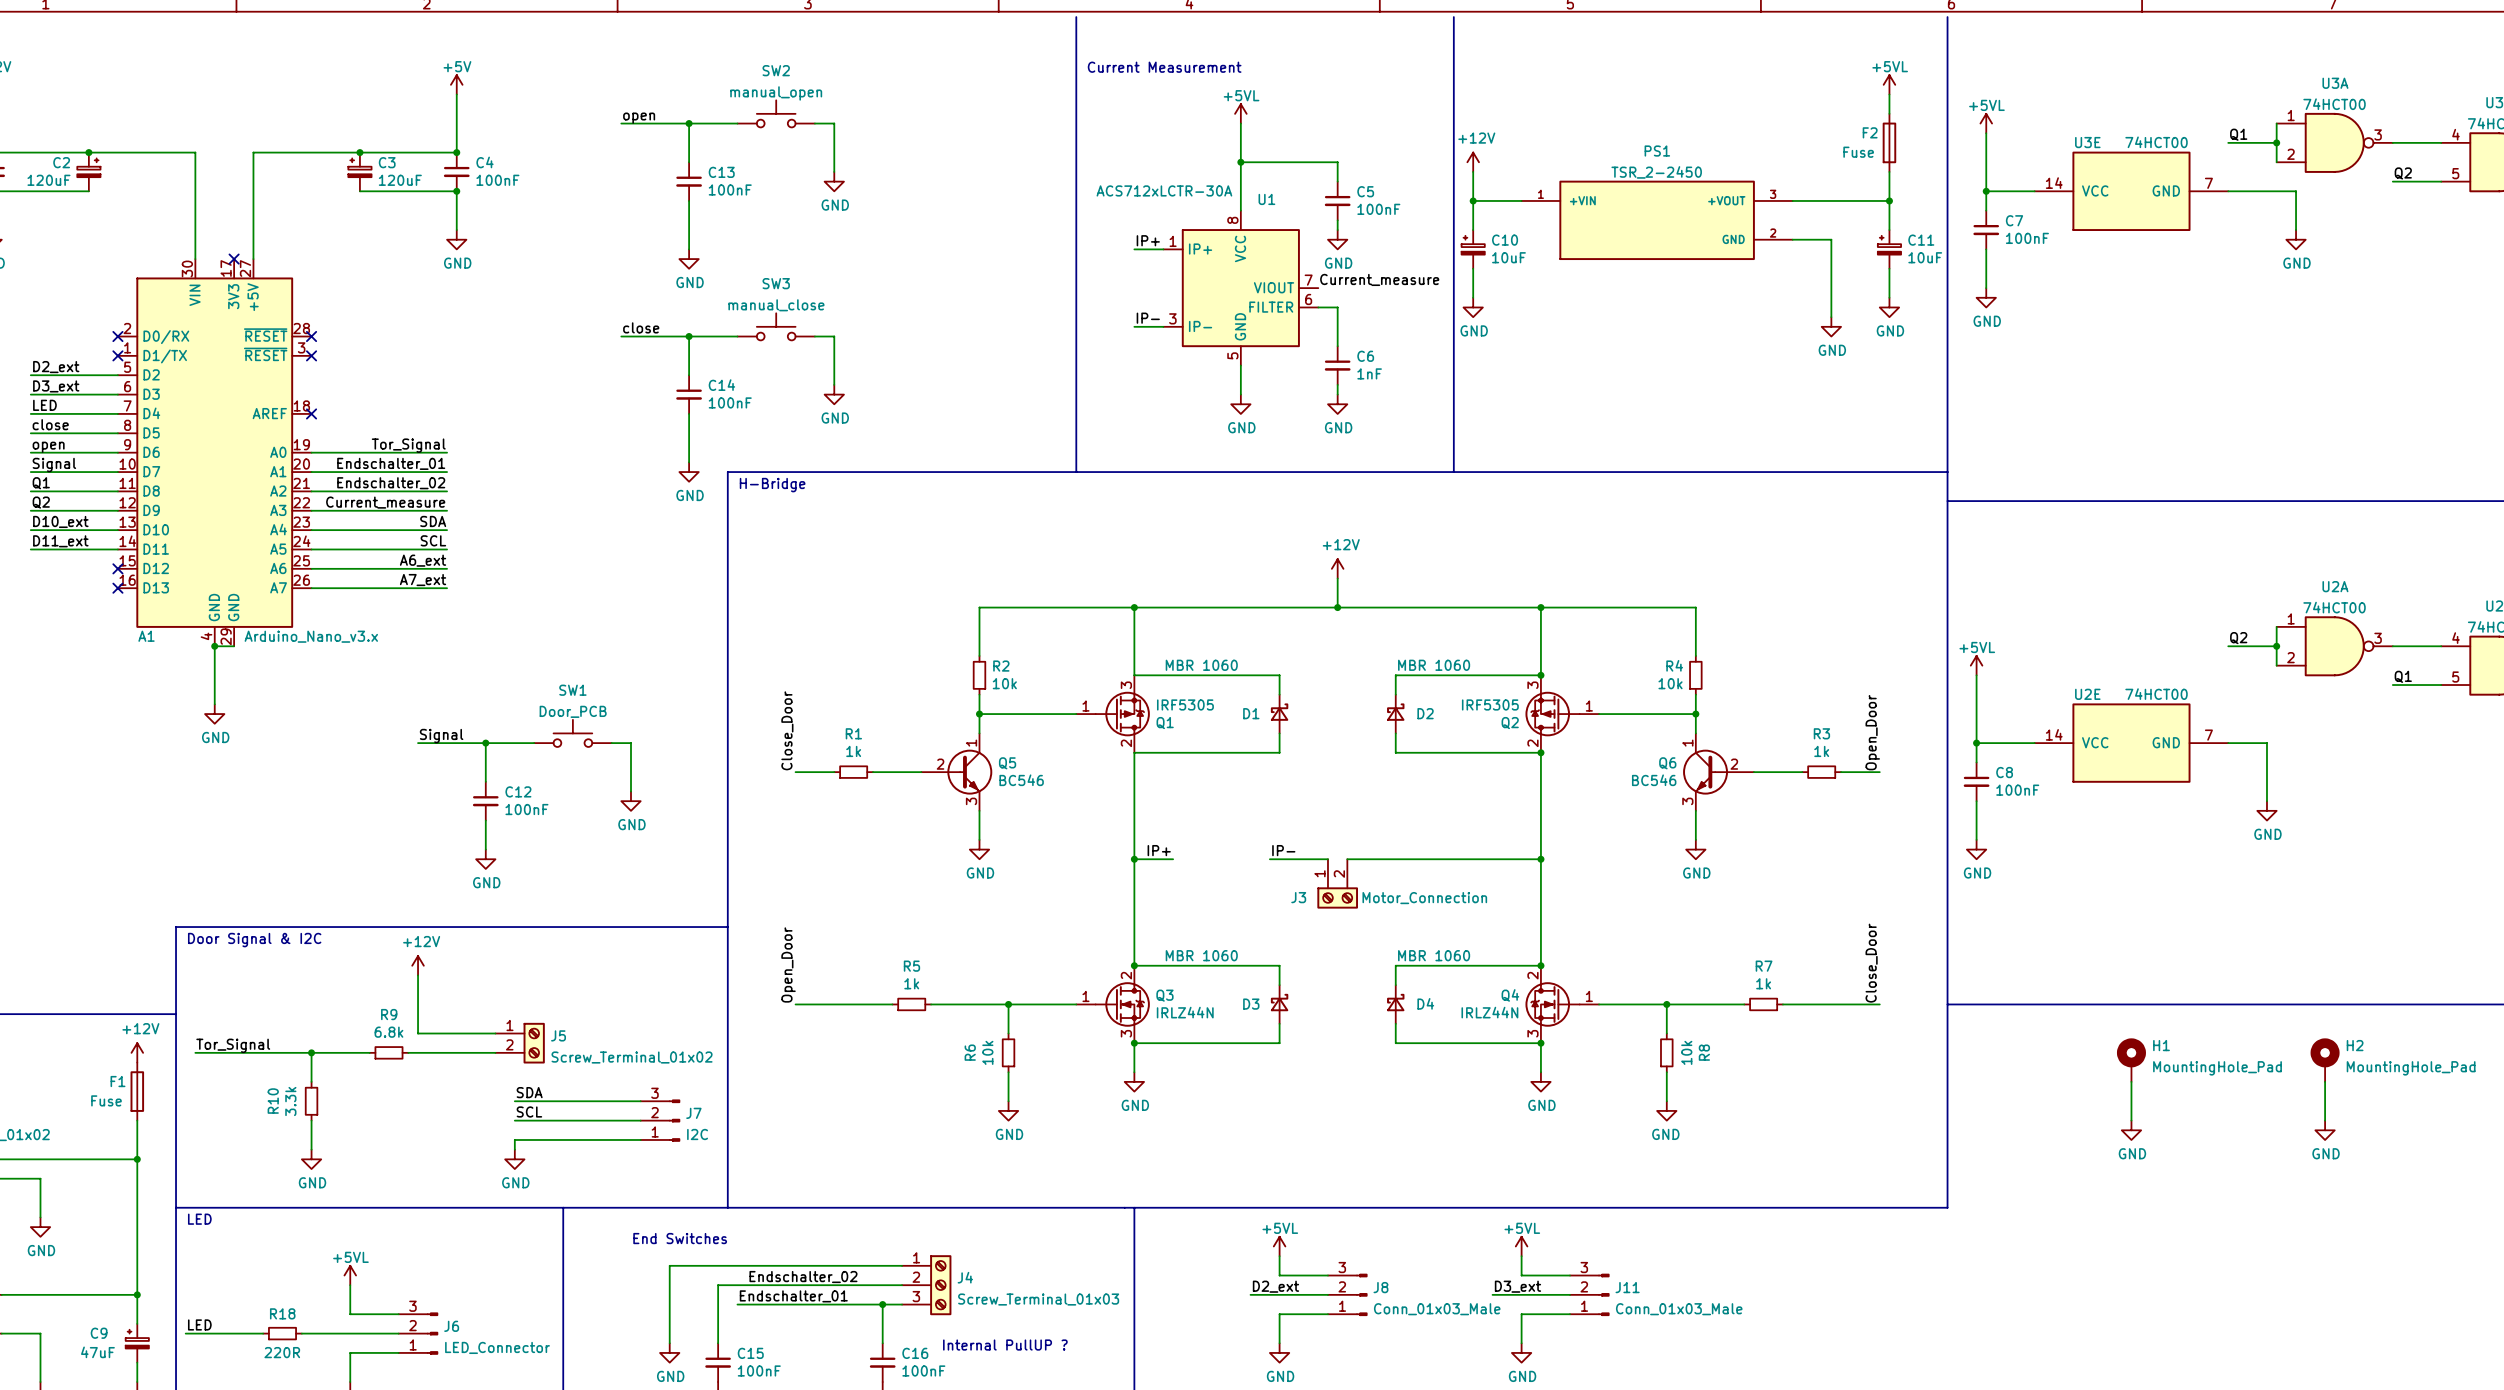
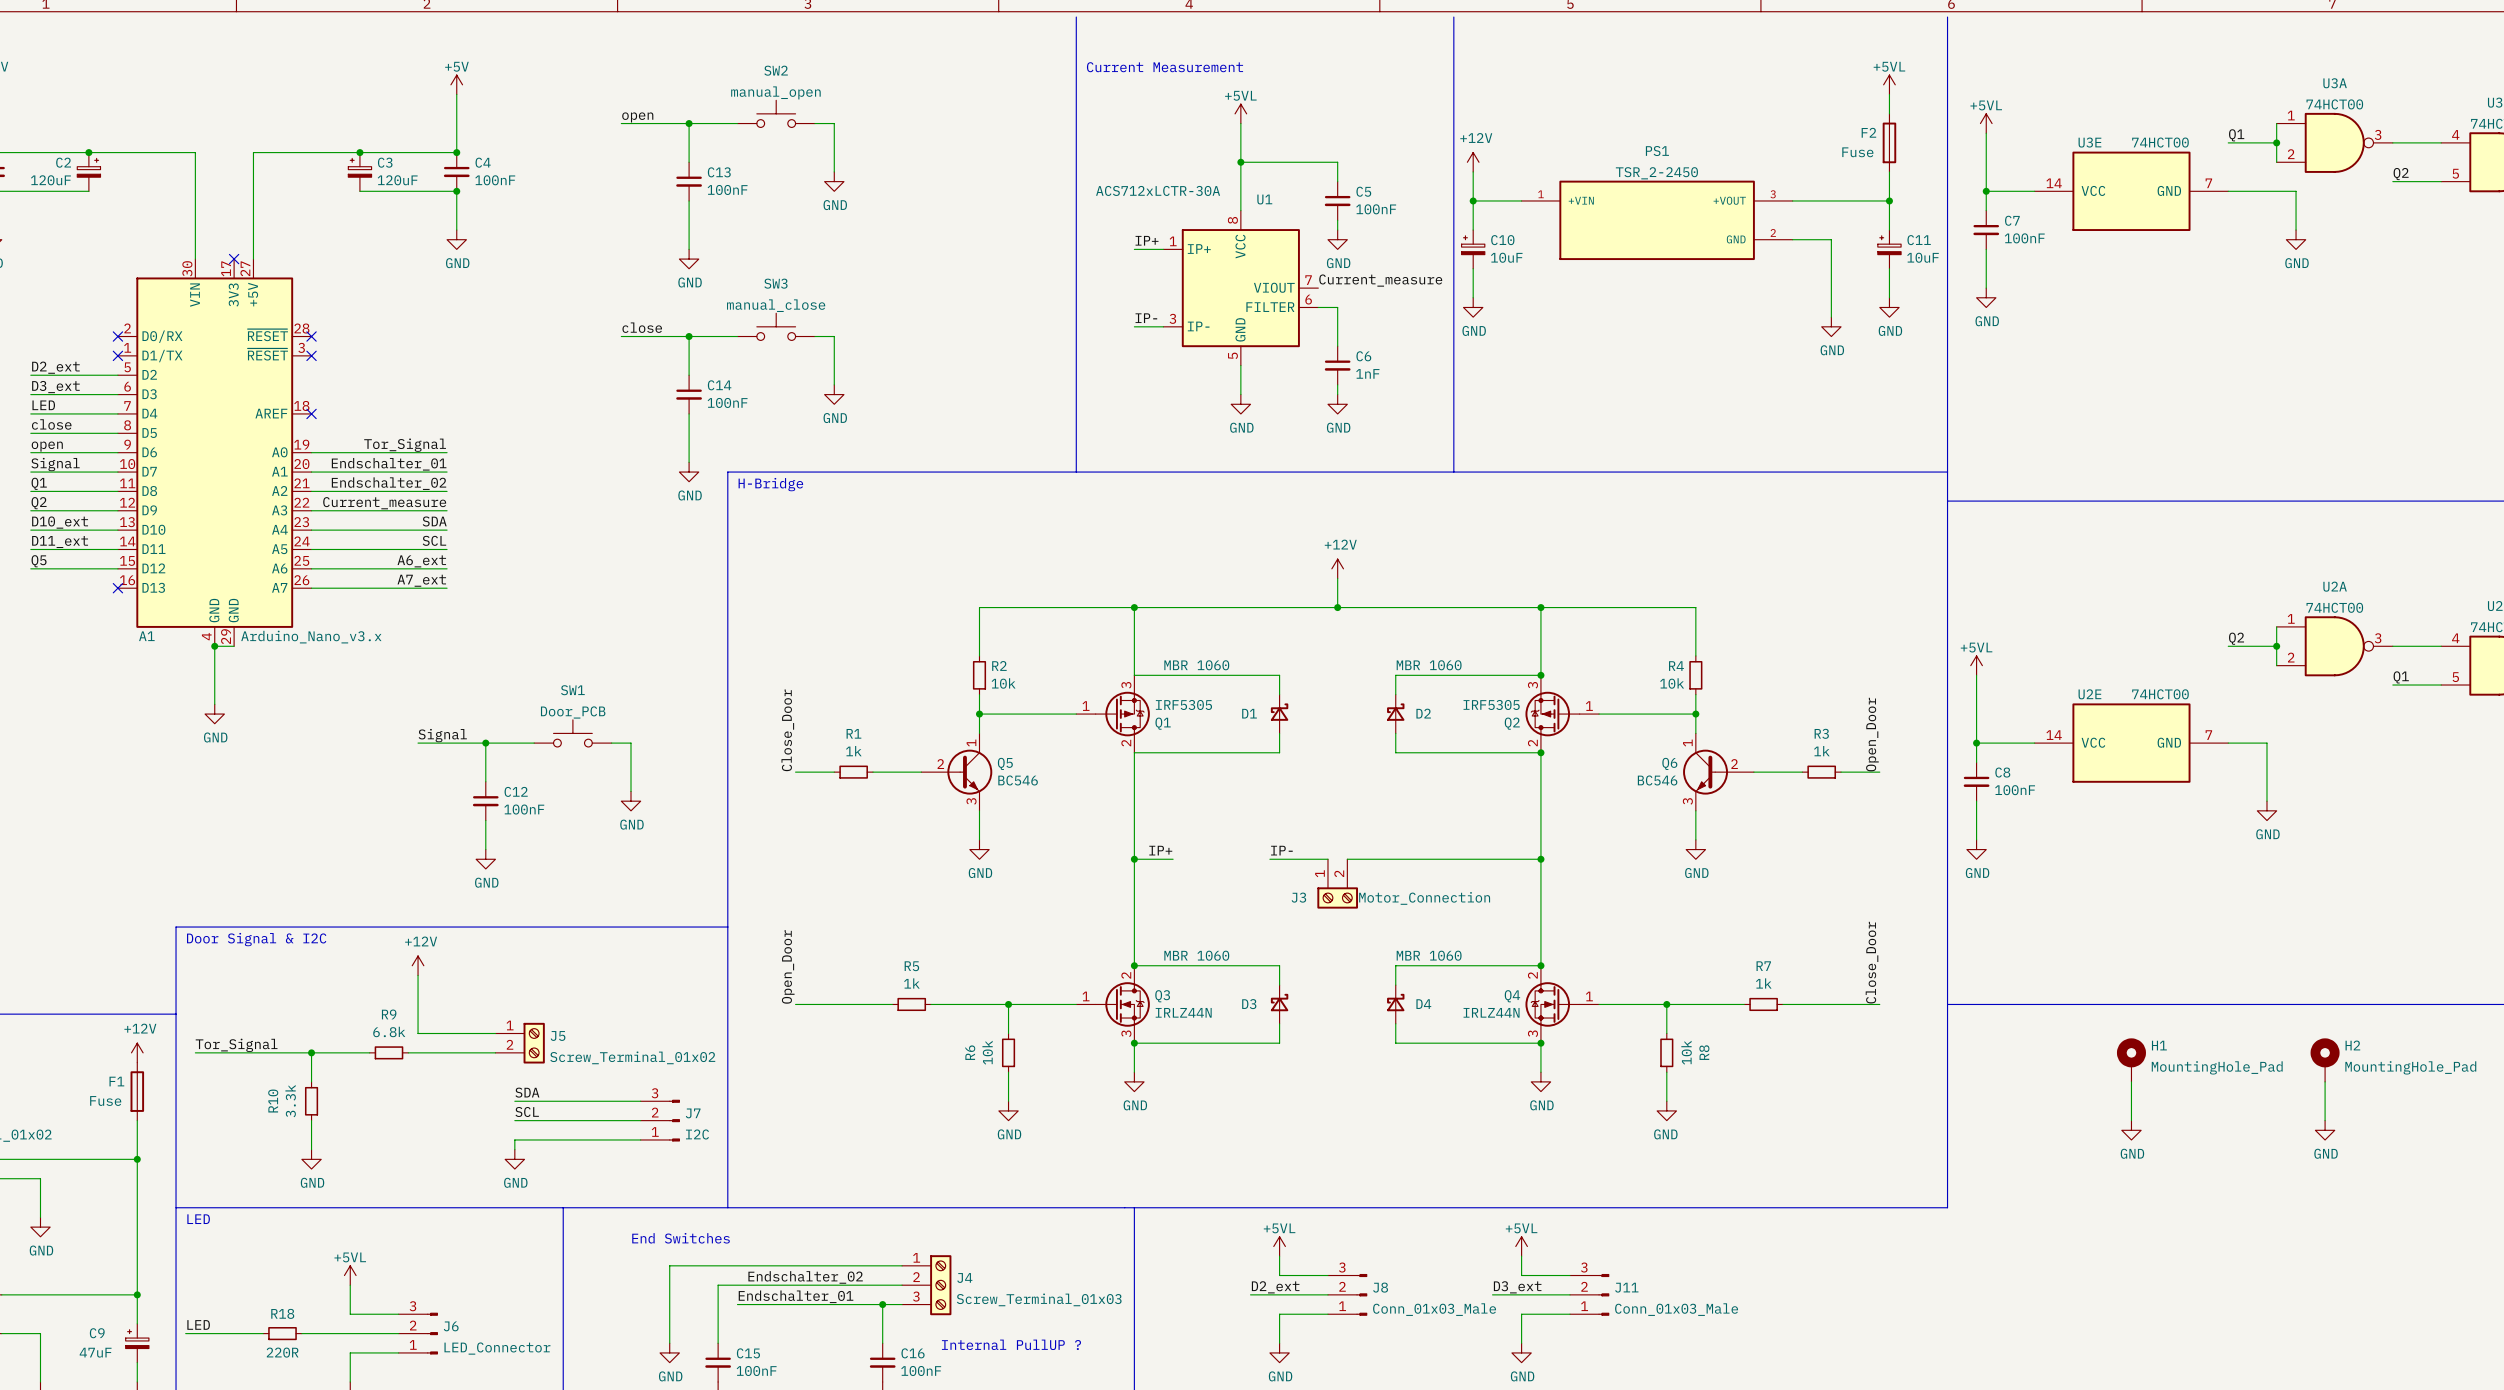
label: none -> Q5 (39, 561)
wire: none -> (30, 568) (117, 568)
no-connect mark: (117, 568) -> none

